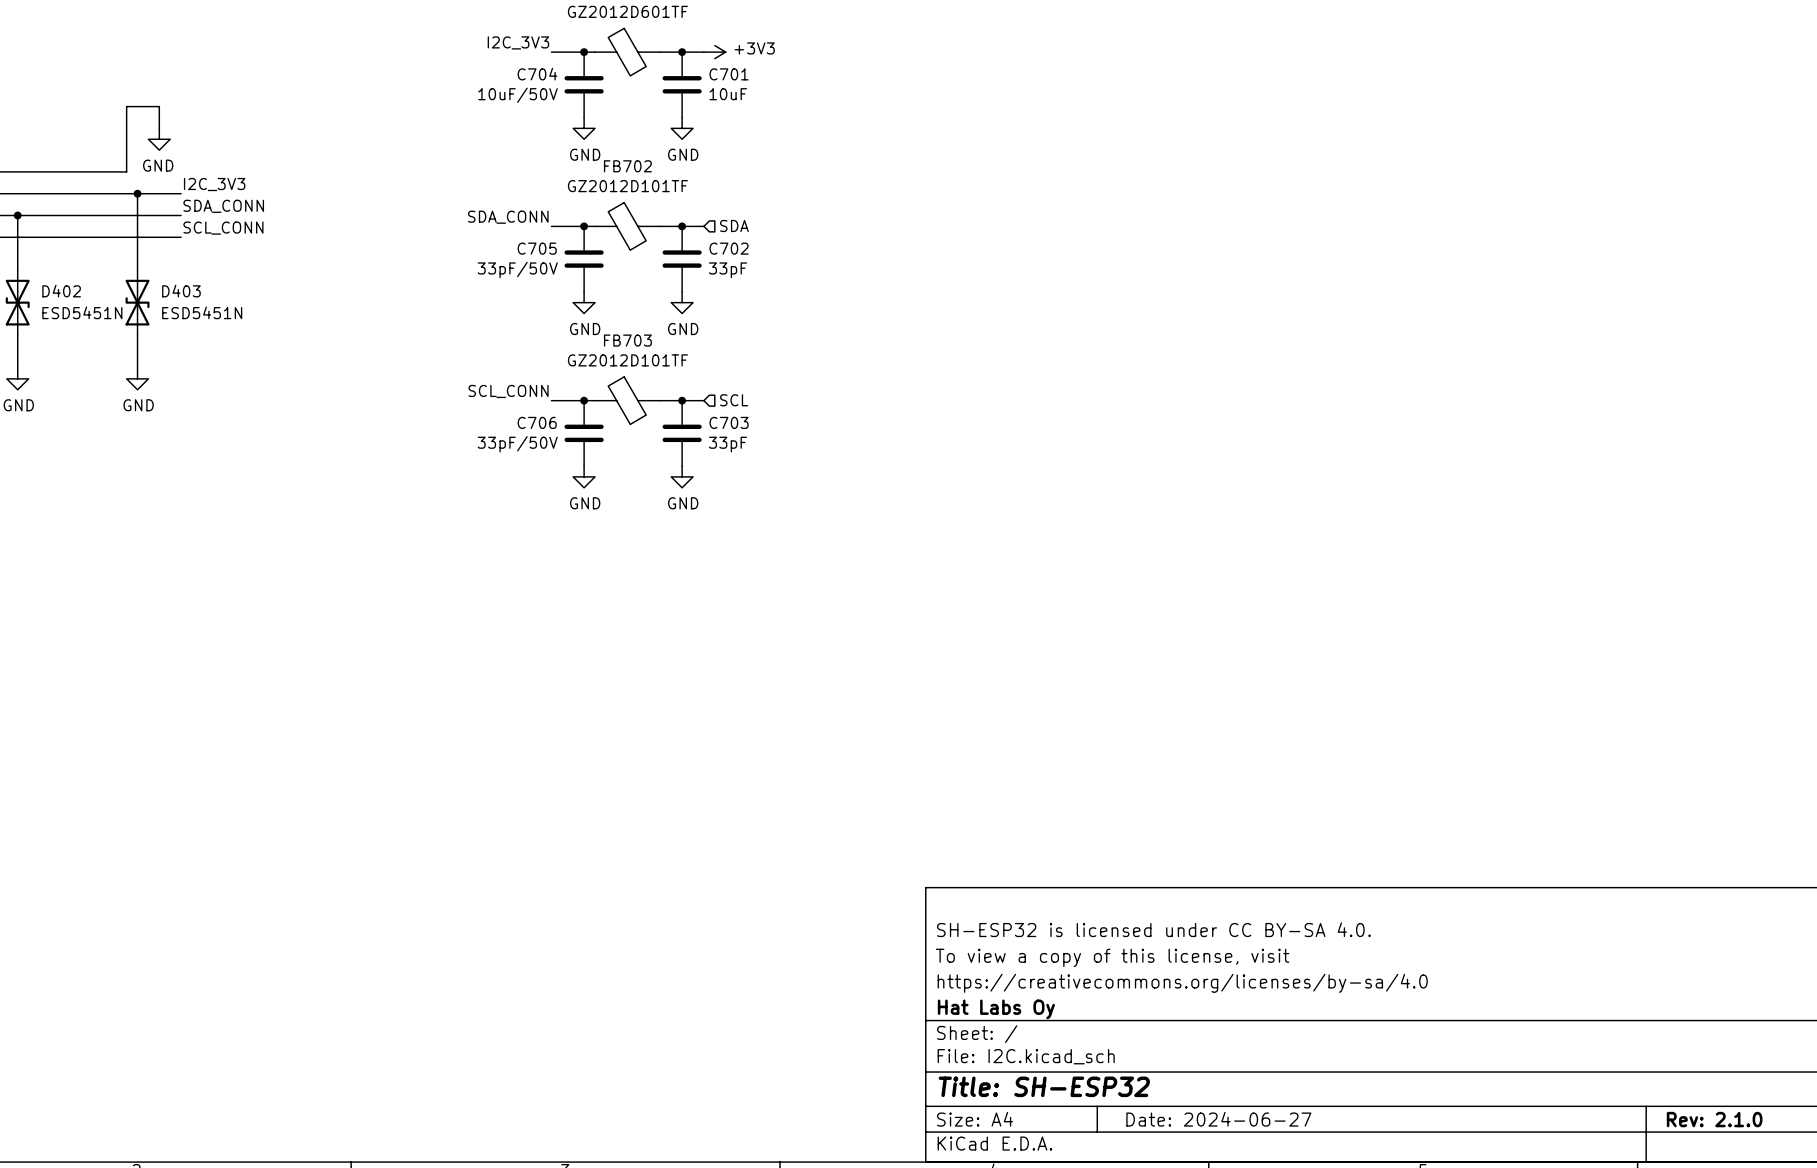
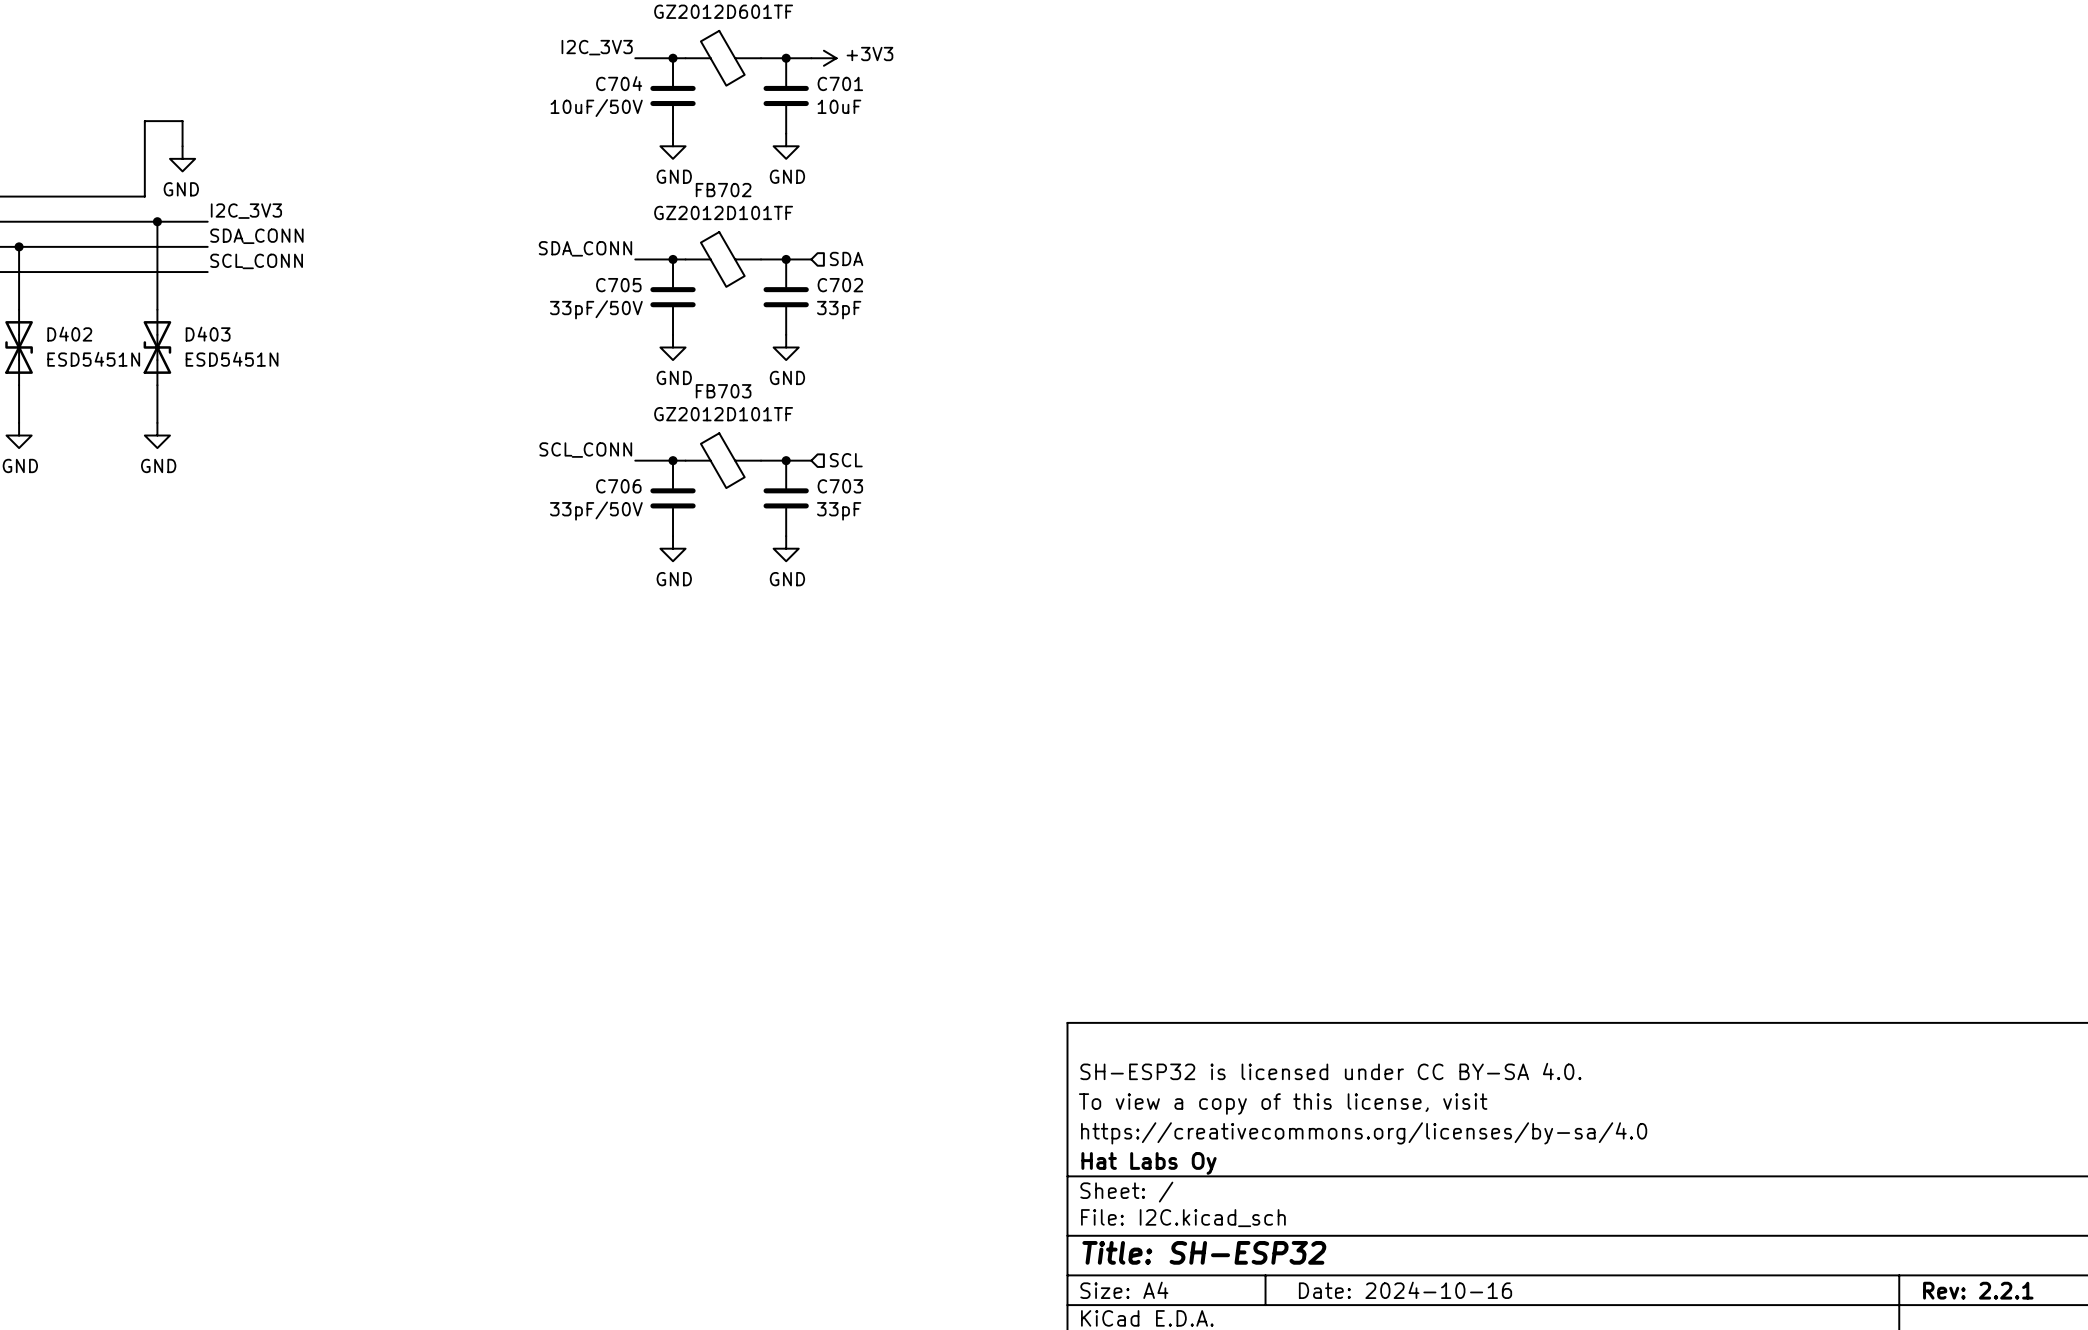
title block: Date: 2024-06-27 (1218, 1119) -> Date: 2024-10-16 (1405, 1290)
title block: Rev: 2.1.0 (1714, 1119) -> Rev: 2.2.1 (1978, 1290)

